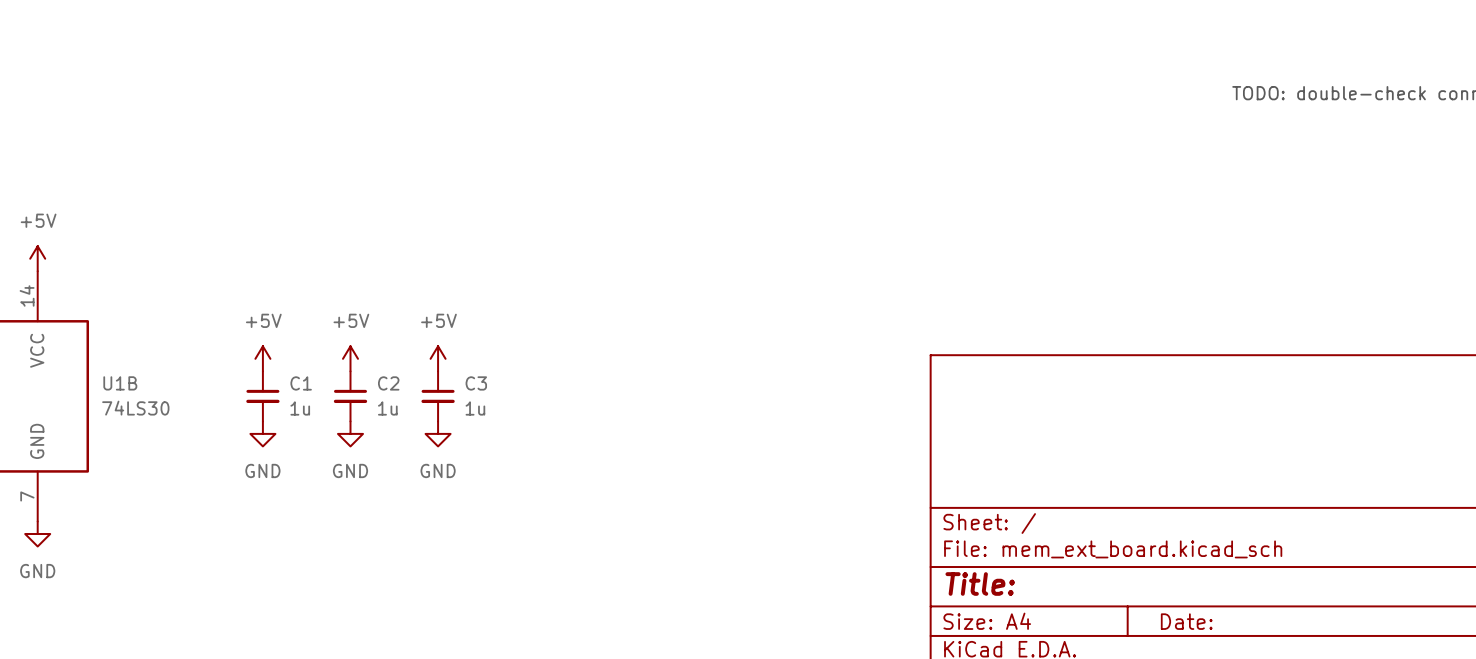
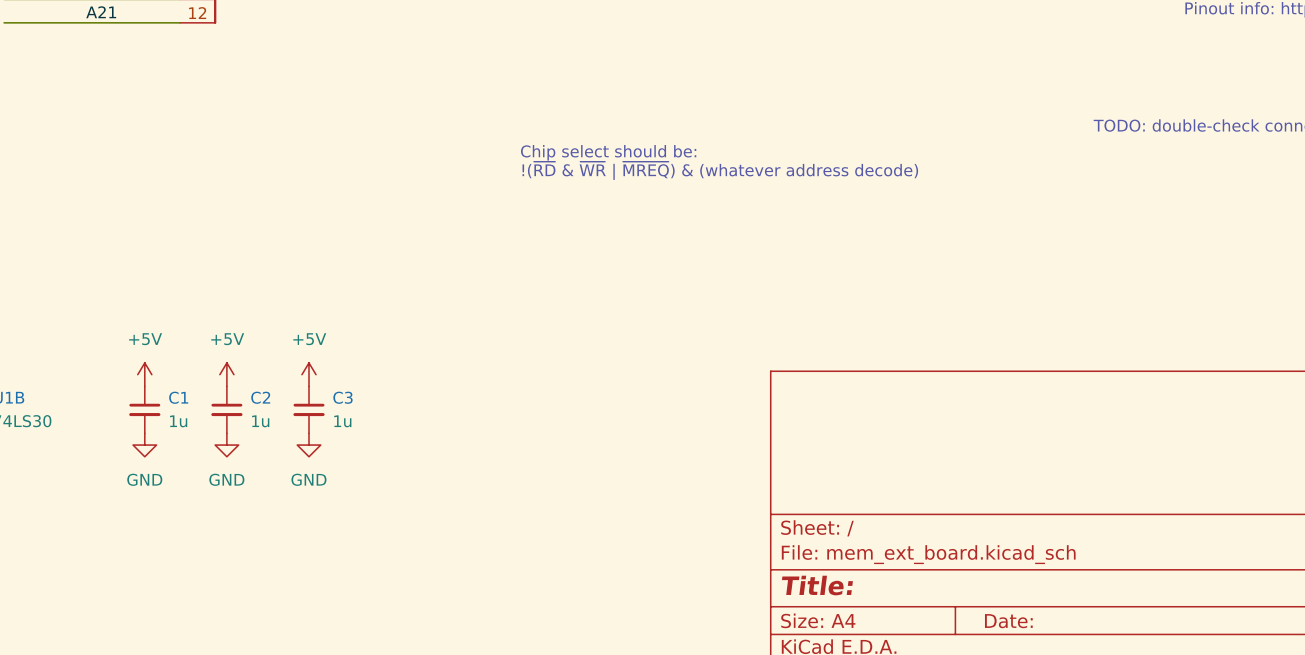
text: none -> Chip select should be: (608, 152)
text: none -> !(~{RD} & ~{WR} | ~{MREQ}) & (whatever address decode) (720, 170)

